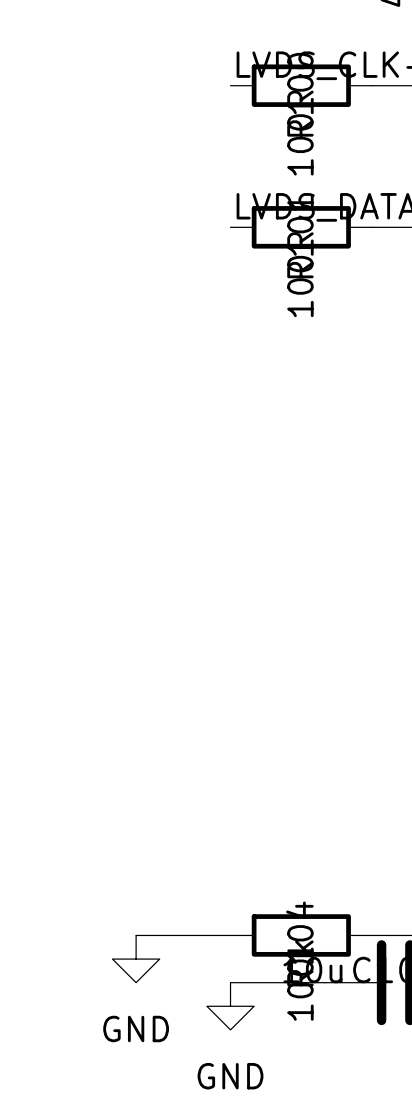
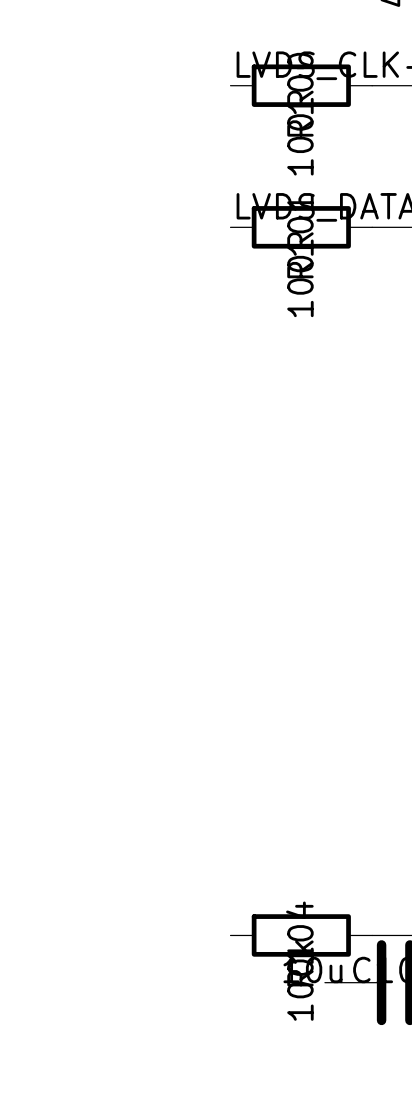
wire: (136, 935) (230, 935) -> none
power symbol: GND (136, 959) -> none
wire: (230, 982) (324, 982) -> none
power symbol: GND (230, 1006) -> none

